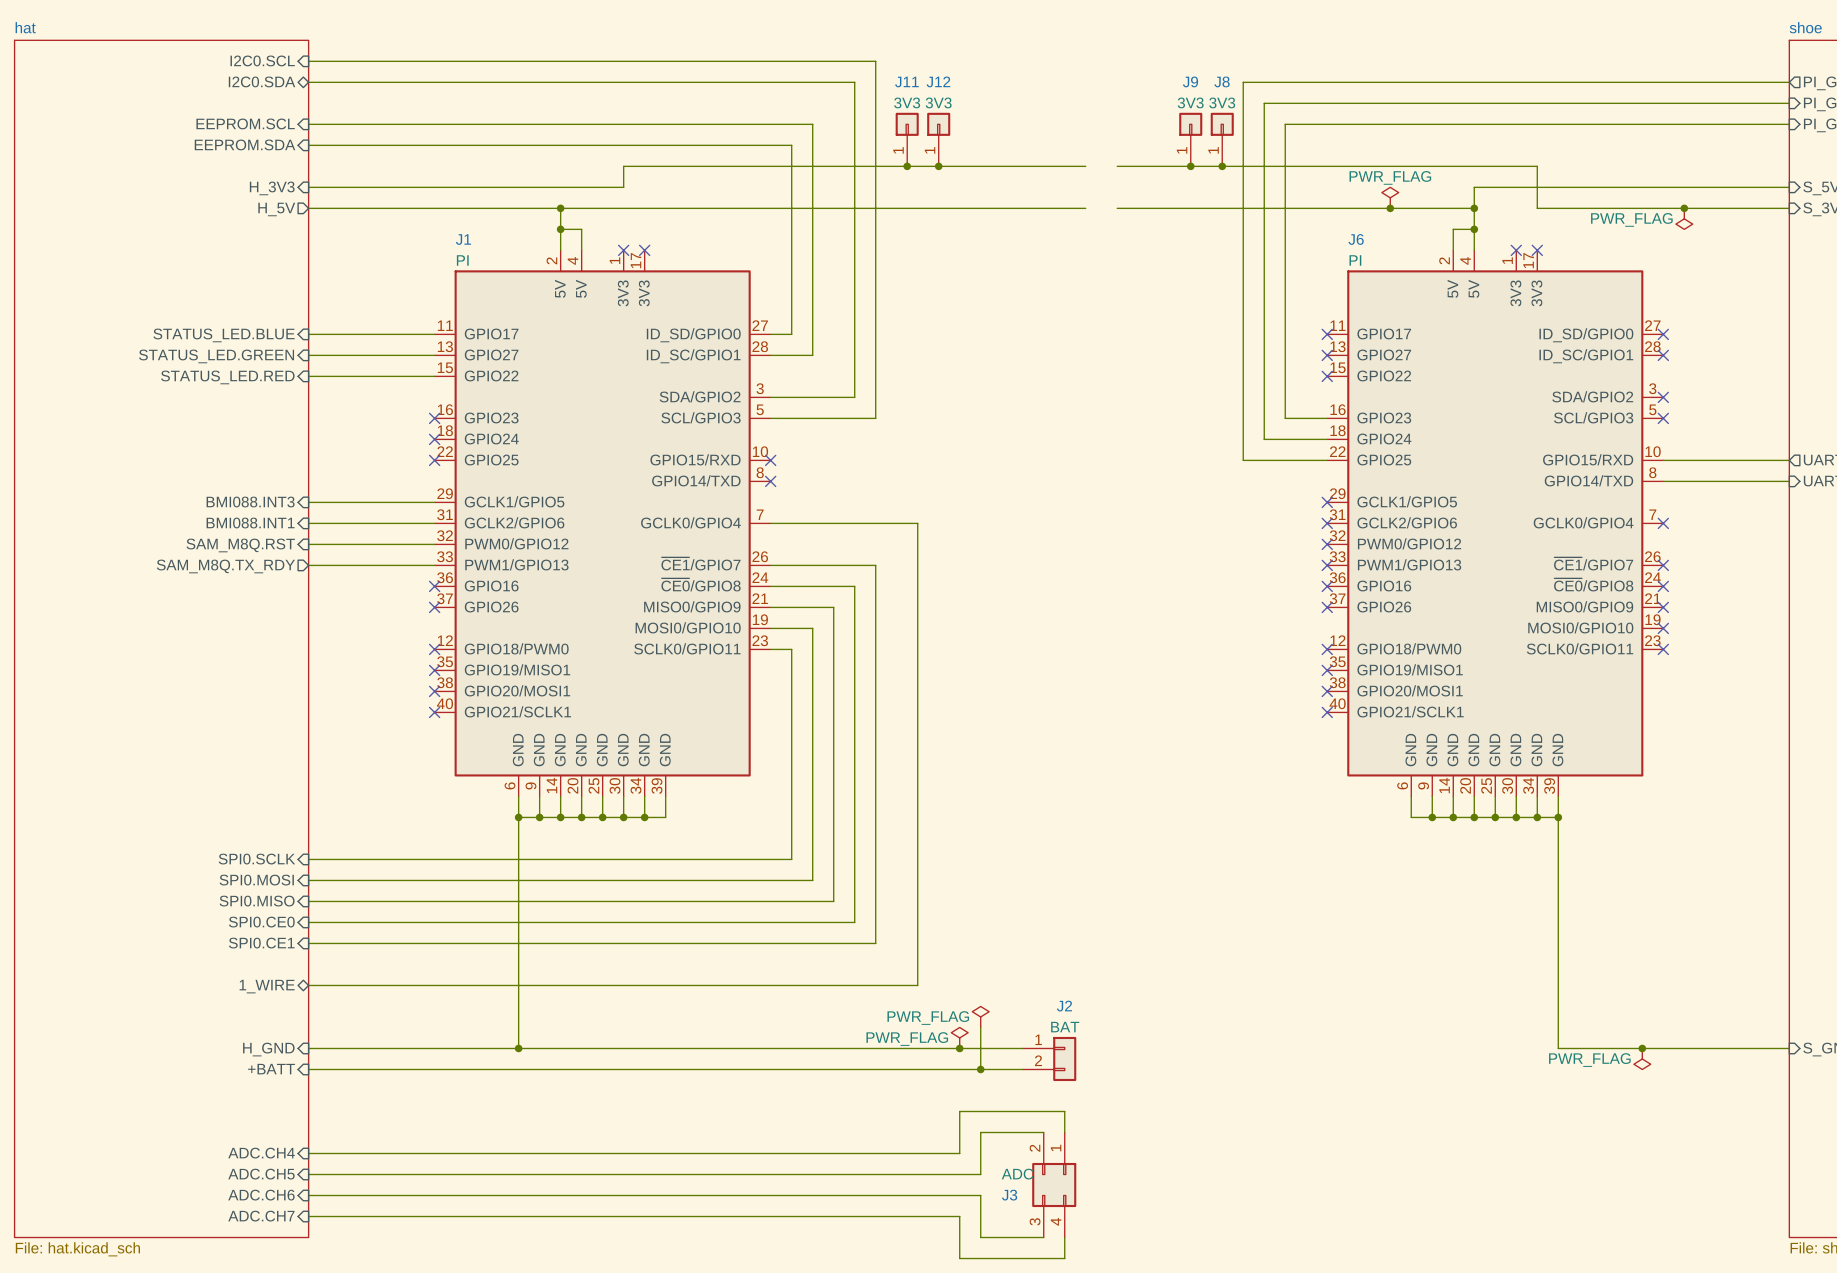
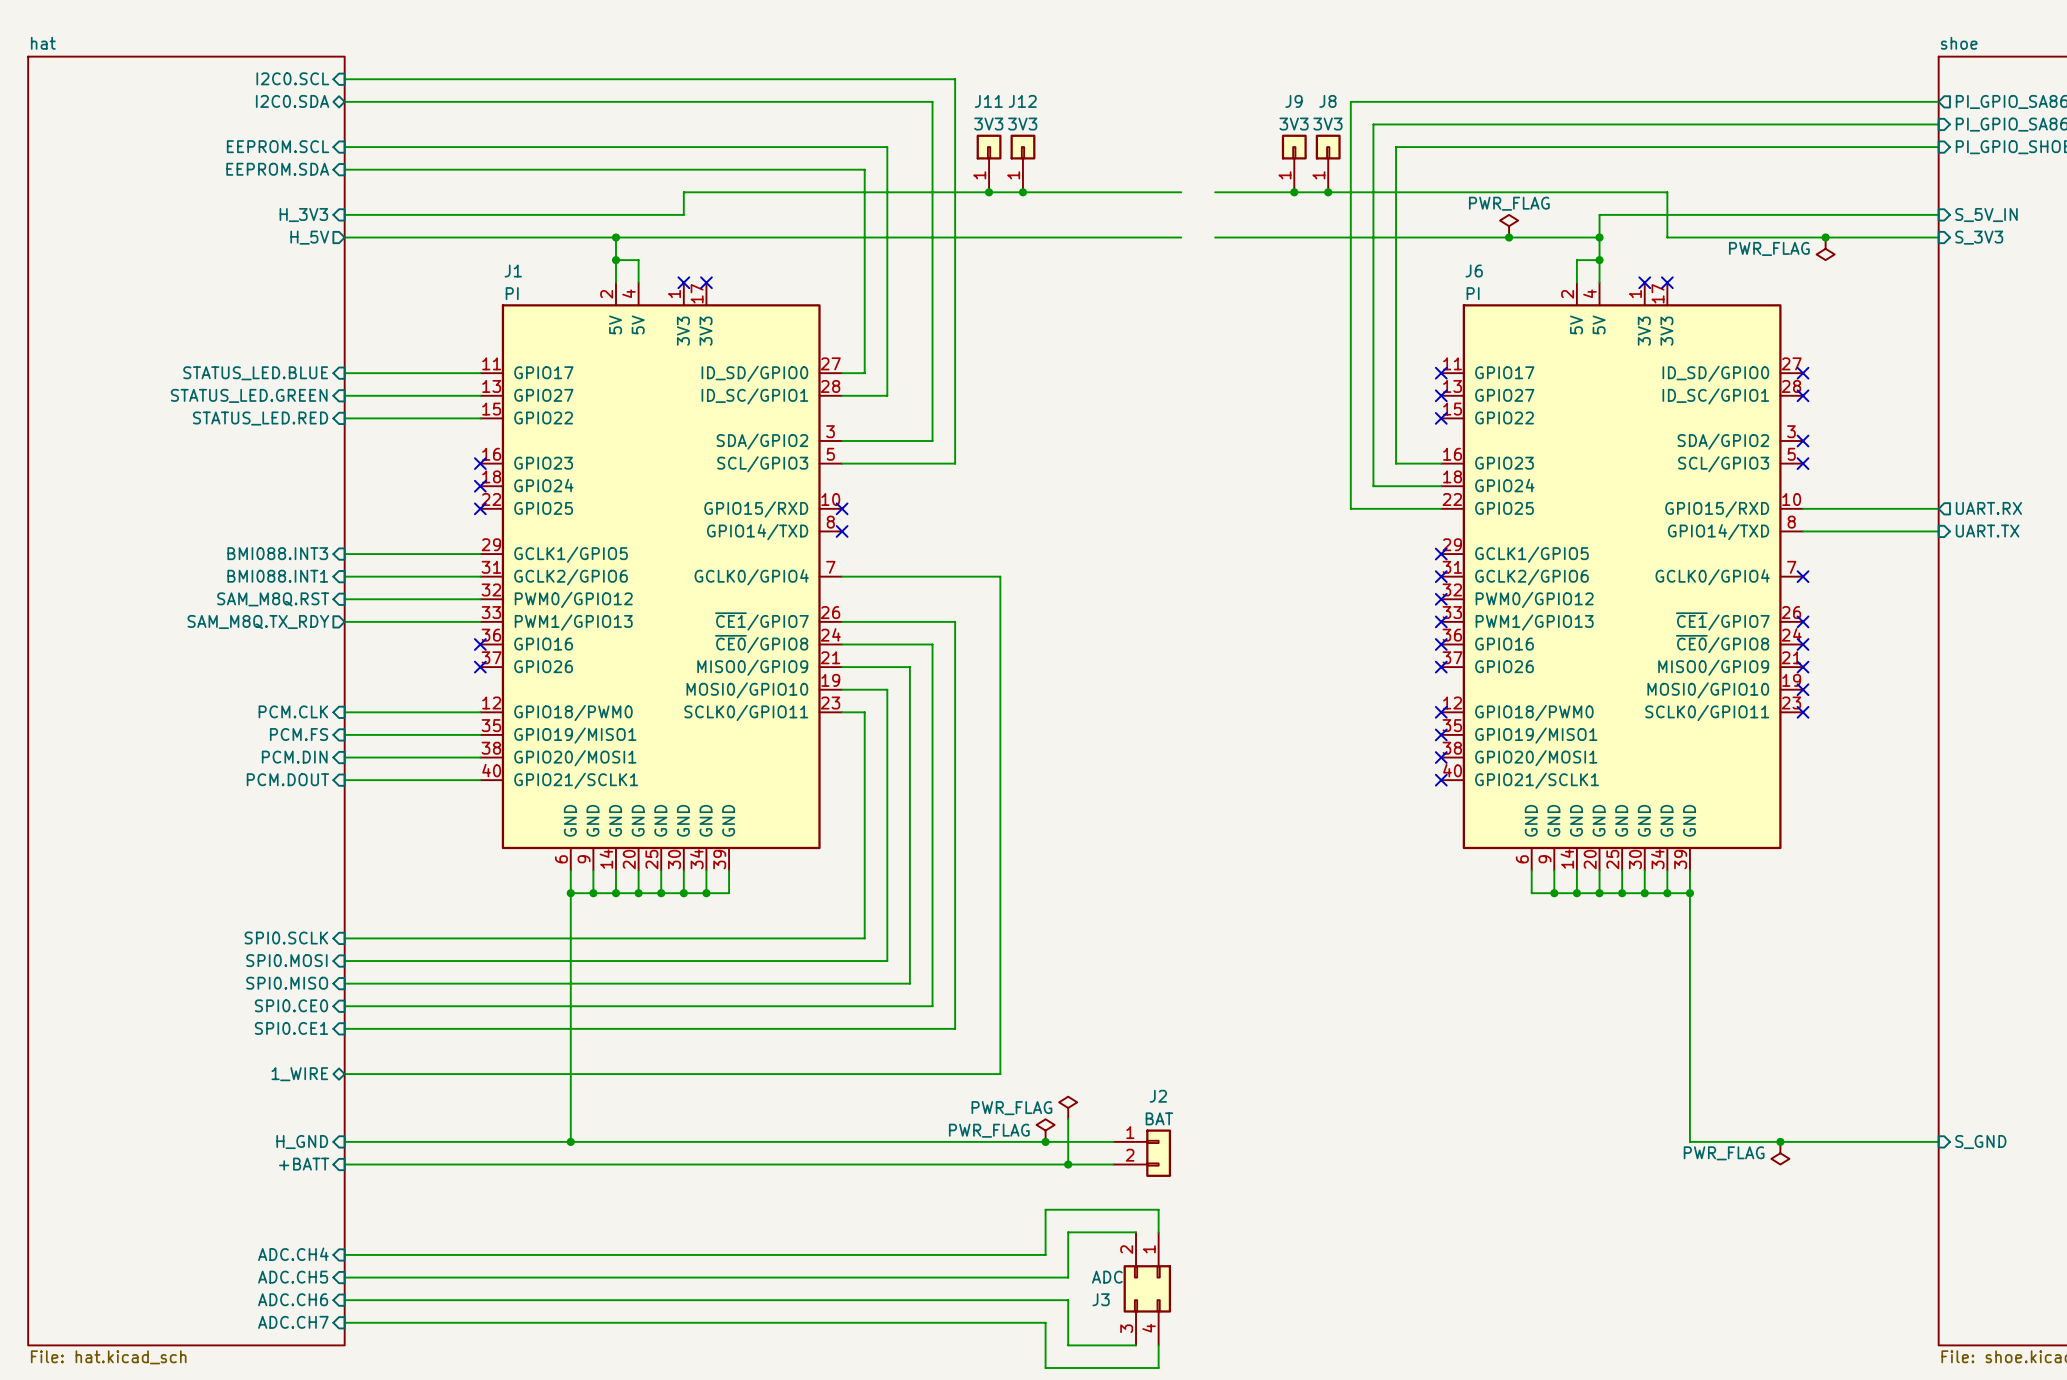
sheet pin: none -> PCM.CLK (293, 711)
wire: none -> (344, 712) (480, 712)
no-connect mark: (434, 649) -> none
sheet pin: none -> PCM.FS (299, 734)
wire: none -> (344, 734) (480, 734)
no-connect mark: (434, 670) -> none
sheet pin: none -> PCM.DIN (294, 757)
wire: none -> (344, 757) (480, 757)
no-connect mark: (434, 691) -> none
sheet pin: none -> PCM.DOUT (287, 779)
wire: none -> (344, 780) (480, 780)
no-connect mark: (434, 712) -> none

